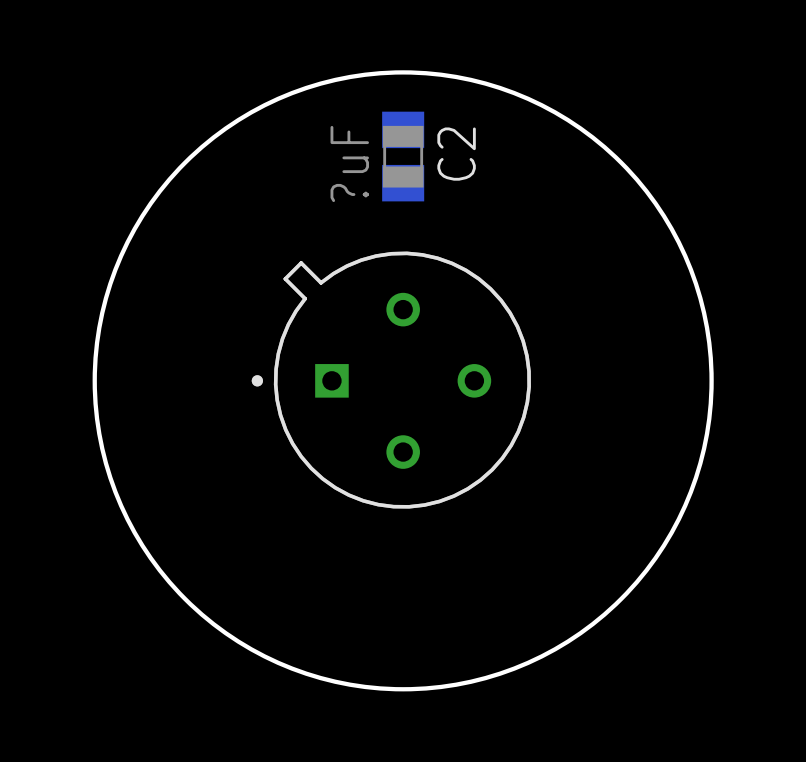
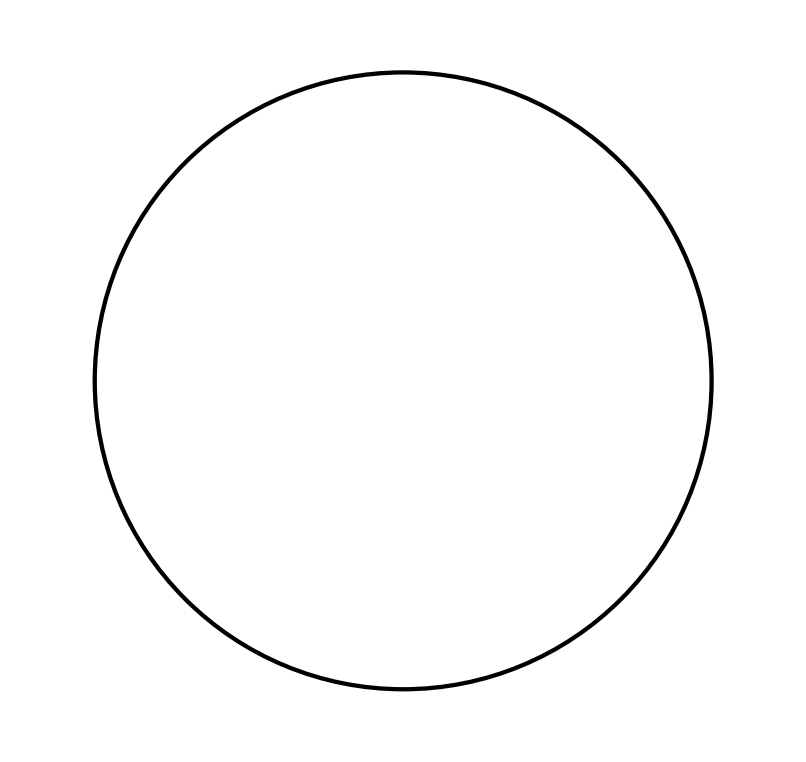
C2: ?uF (403, 156) -> none
part: (391, 380) -> none

